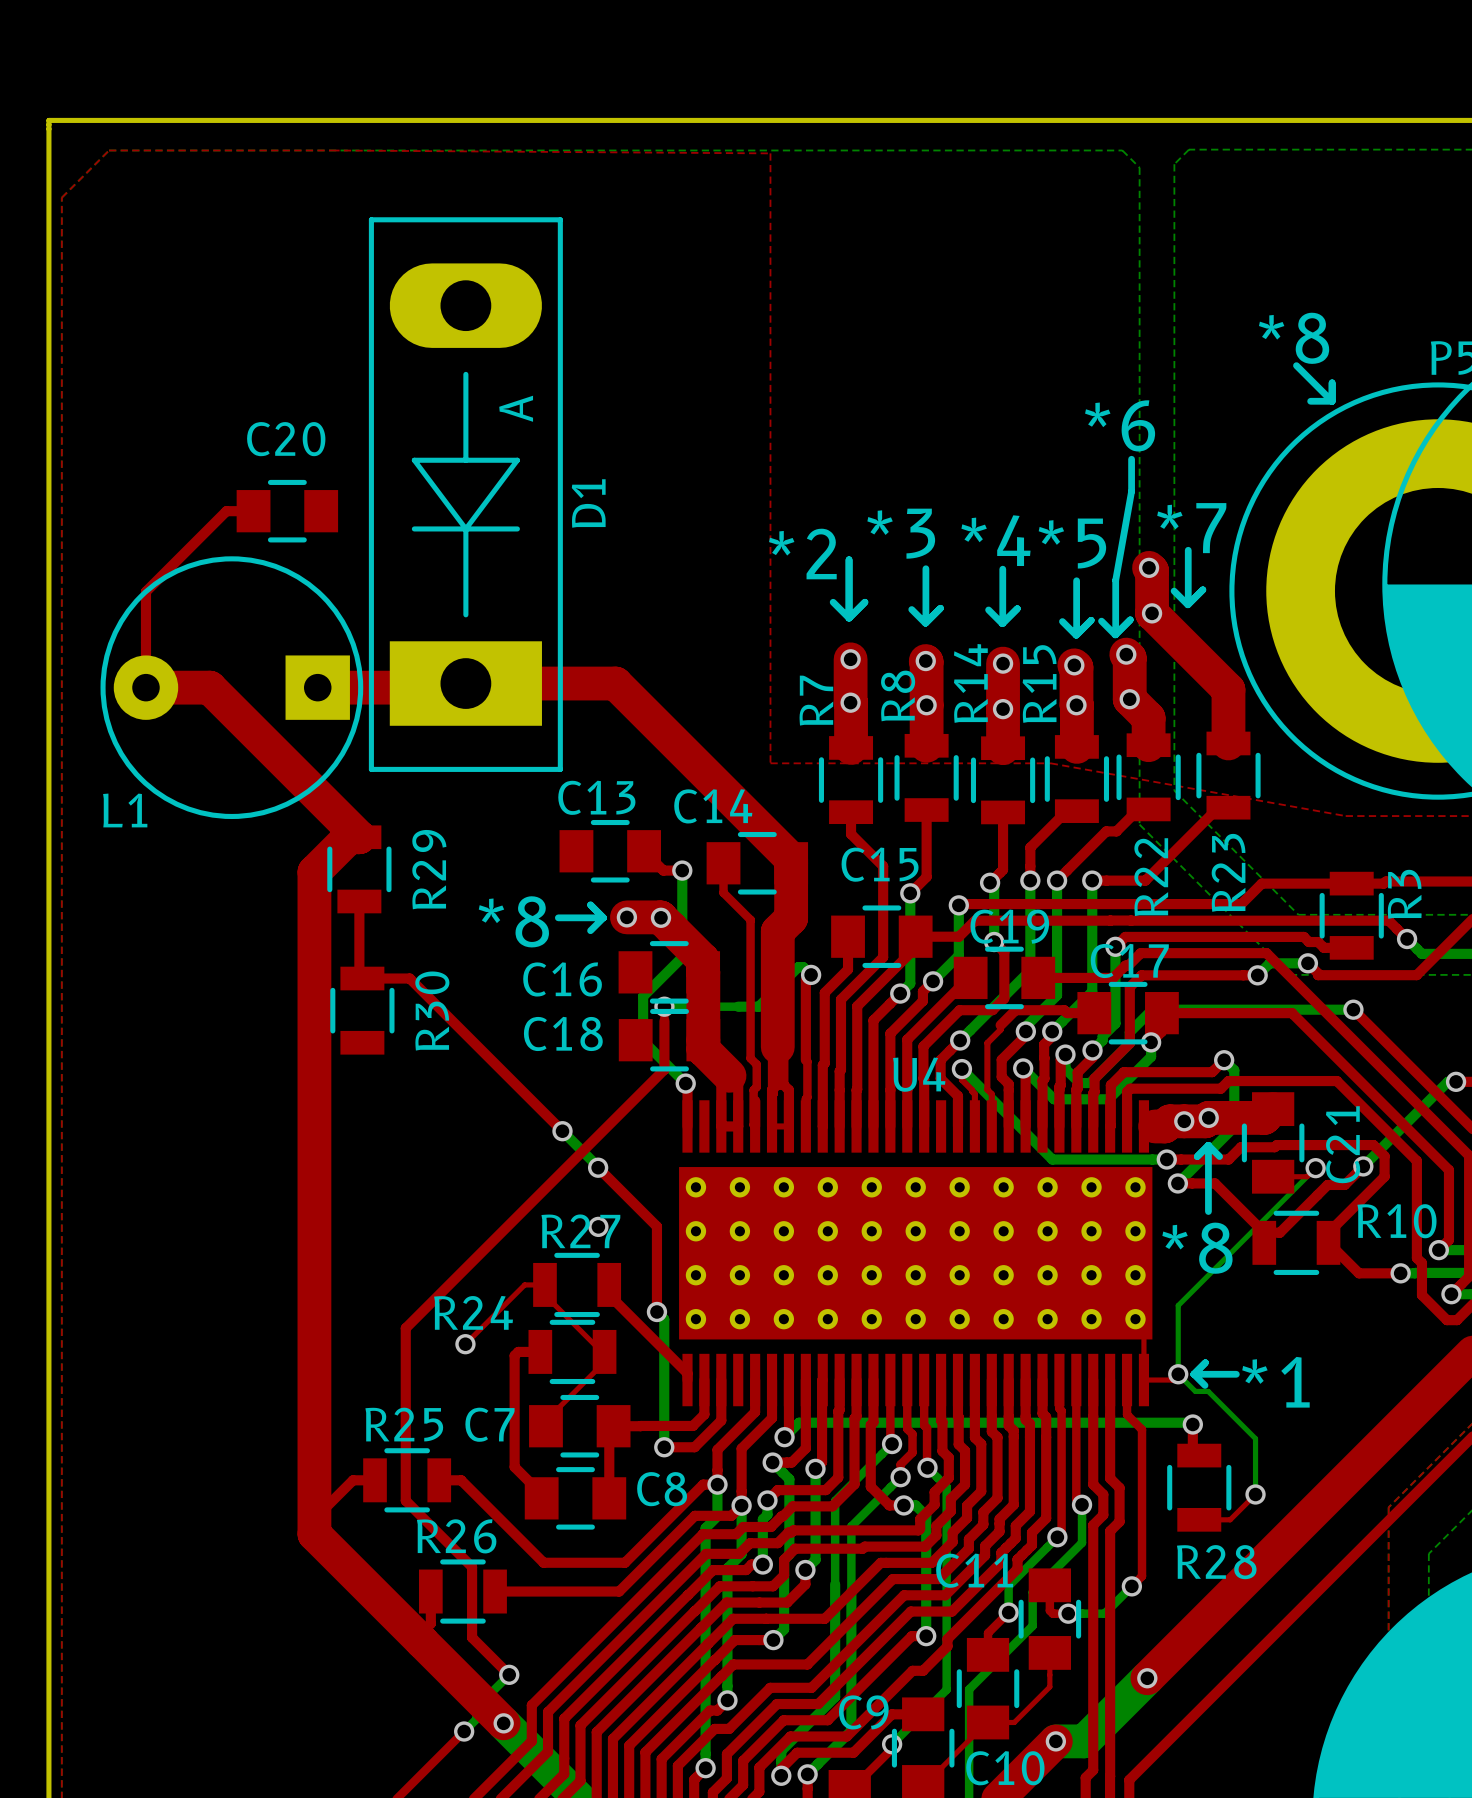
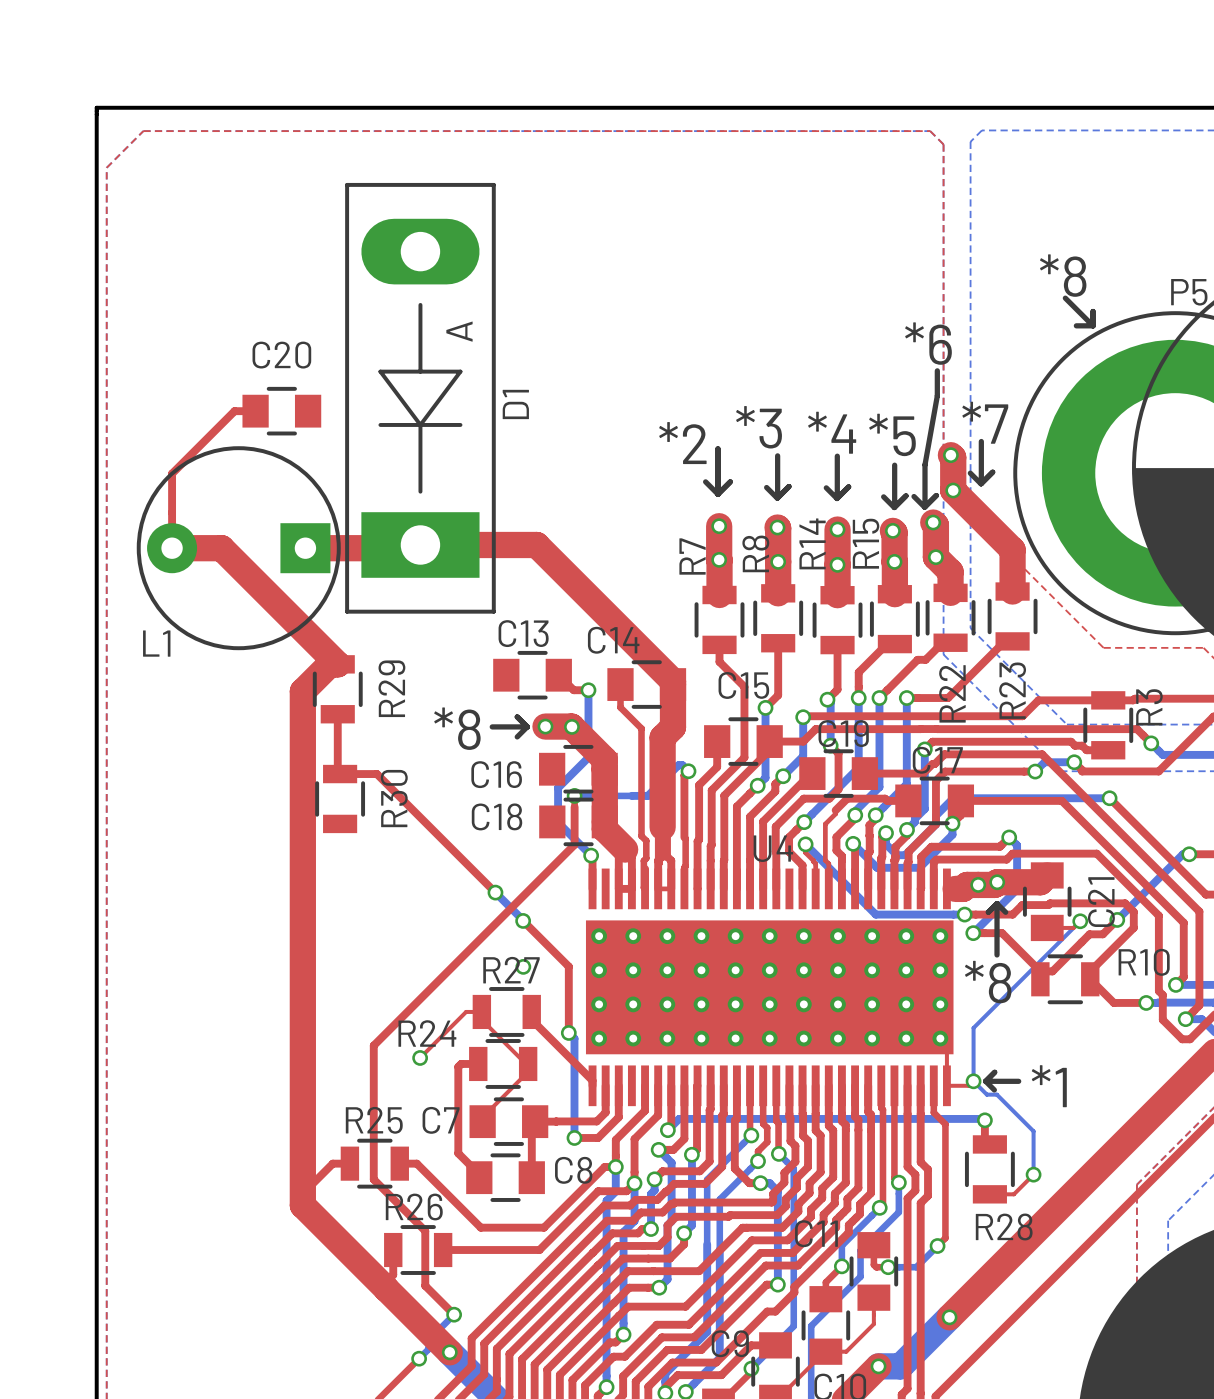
top zone outline: (332, 150) (770, 153) (770, 763) (1050, 763) (1345, 816) -> (316, 131) (930, 131) (943, 144) (943, 487) (1103, 647)

